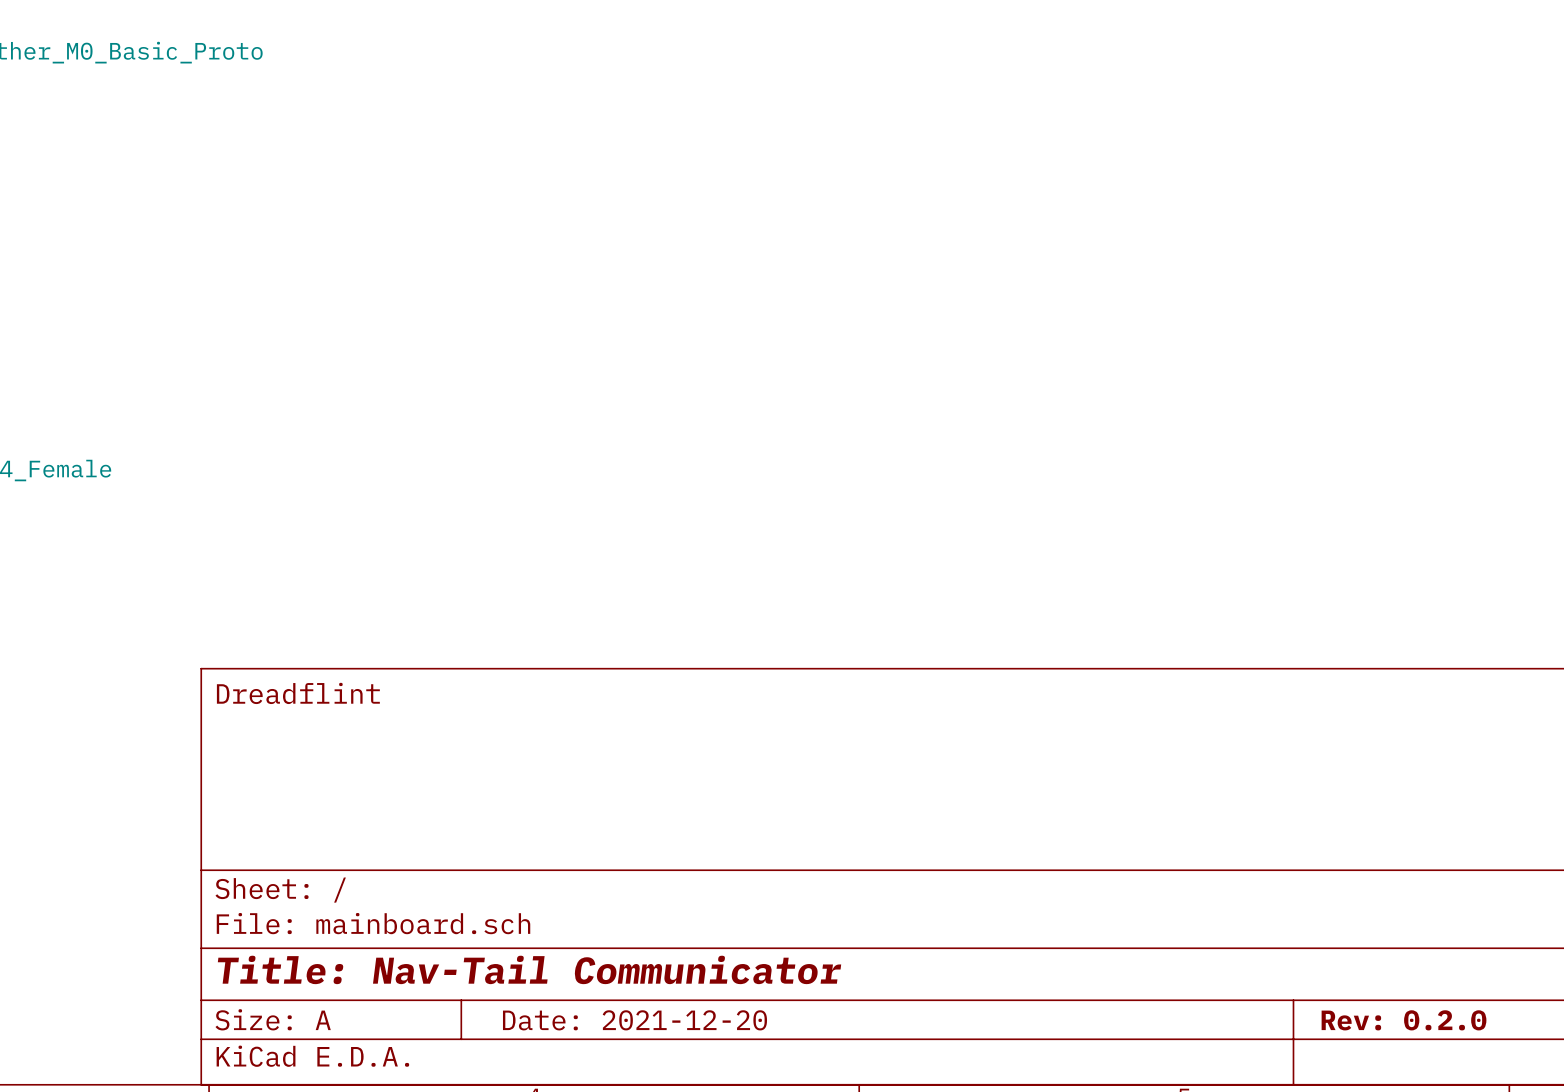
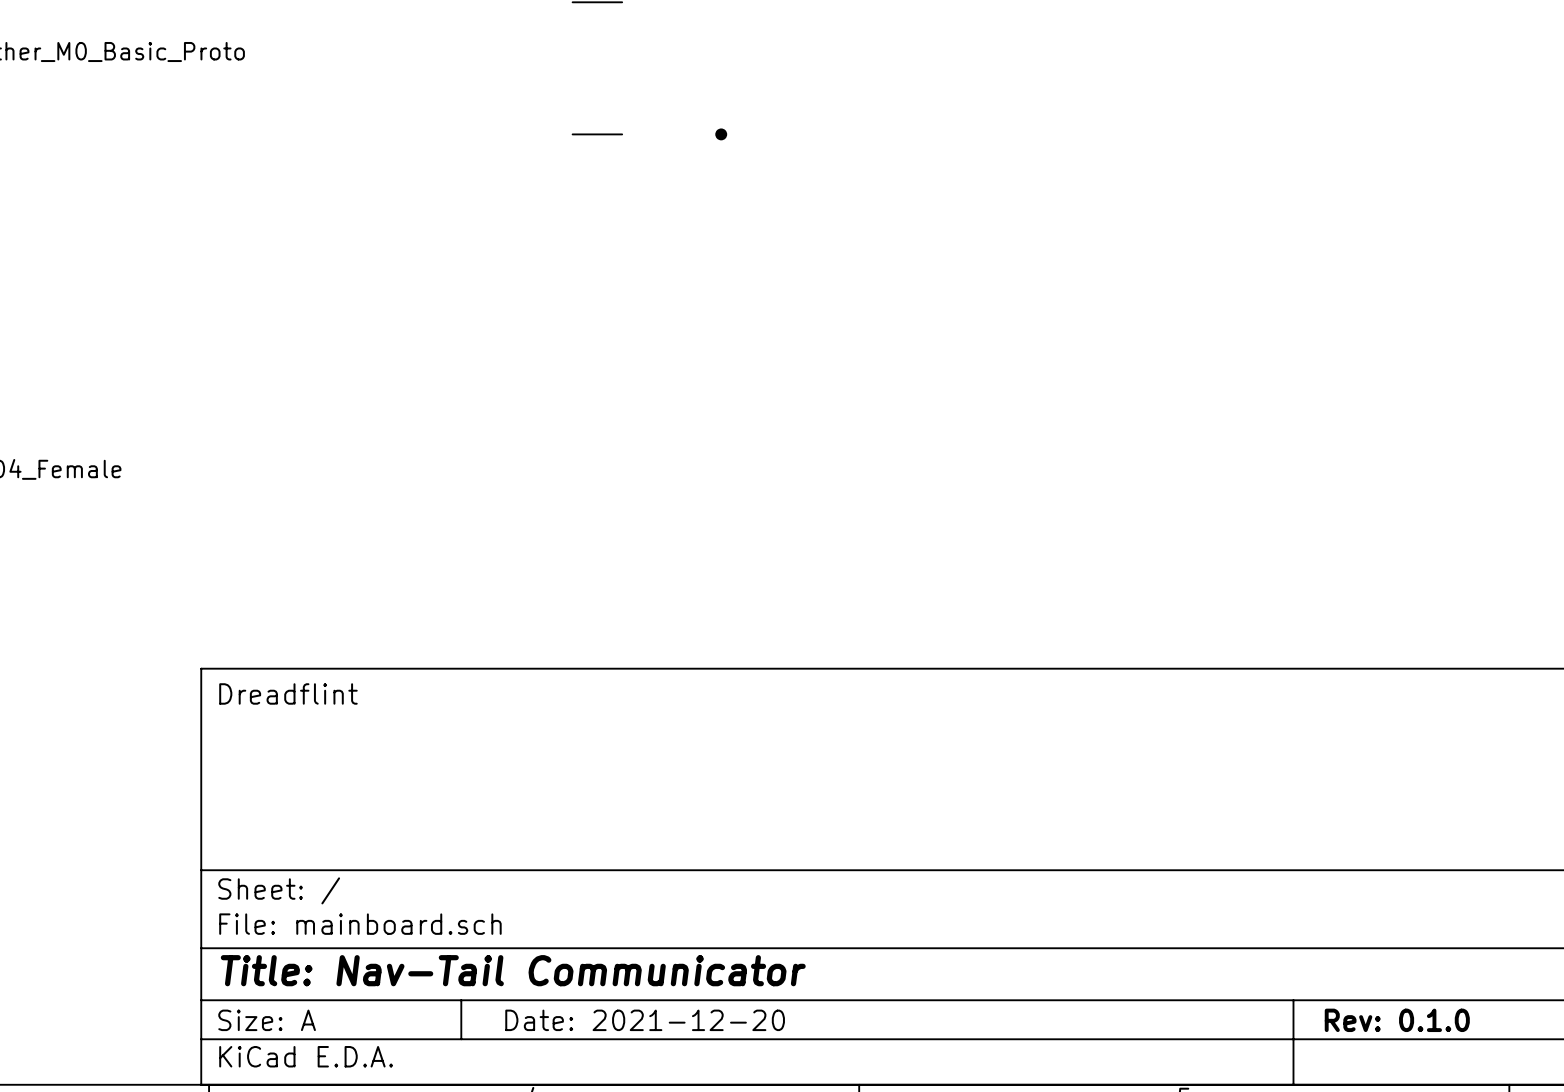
wire: none -> (572, 2) (622, 2)
wire: none -> (572, 134) (622, 134)
junction: none -> (721, 134)
title block: Rev: 0.2.0 (1404, 1020) -> Rev: 0.1.0 (1397, 1020)

